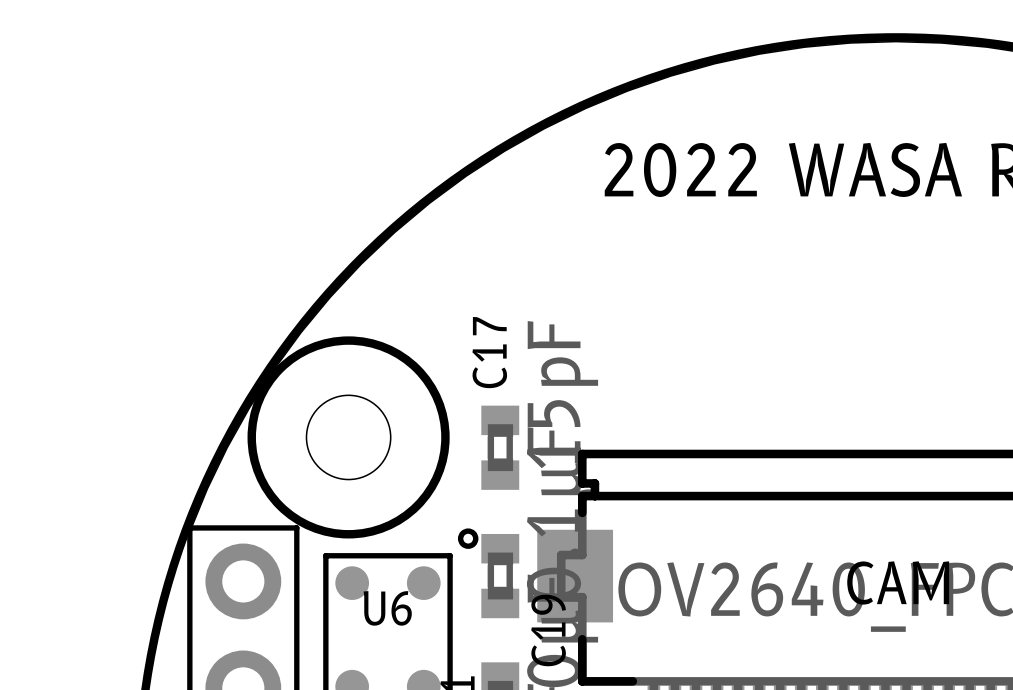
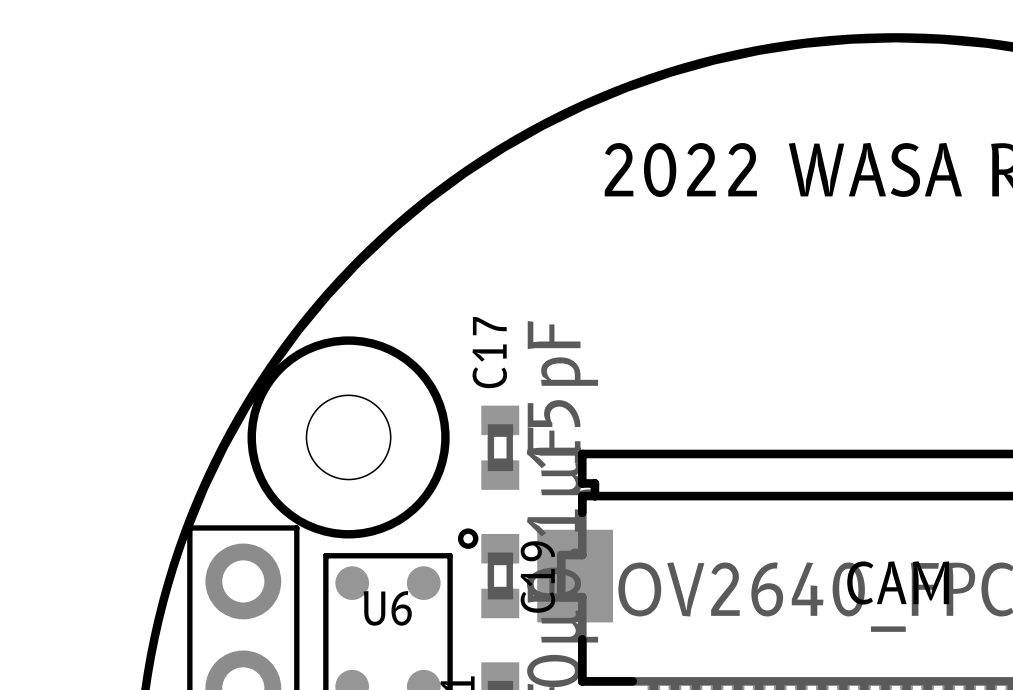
C19 name position: C19 (548, 630) -> C19 (537, 577)

